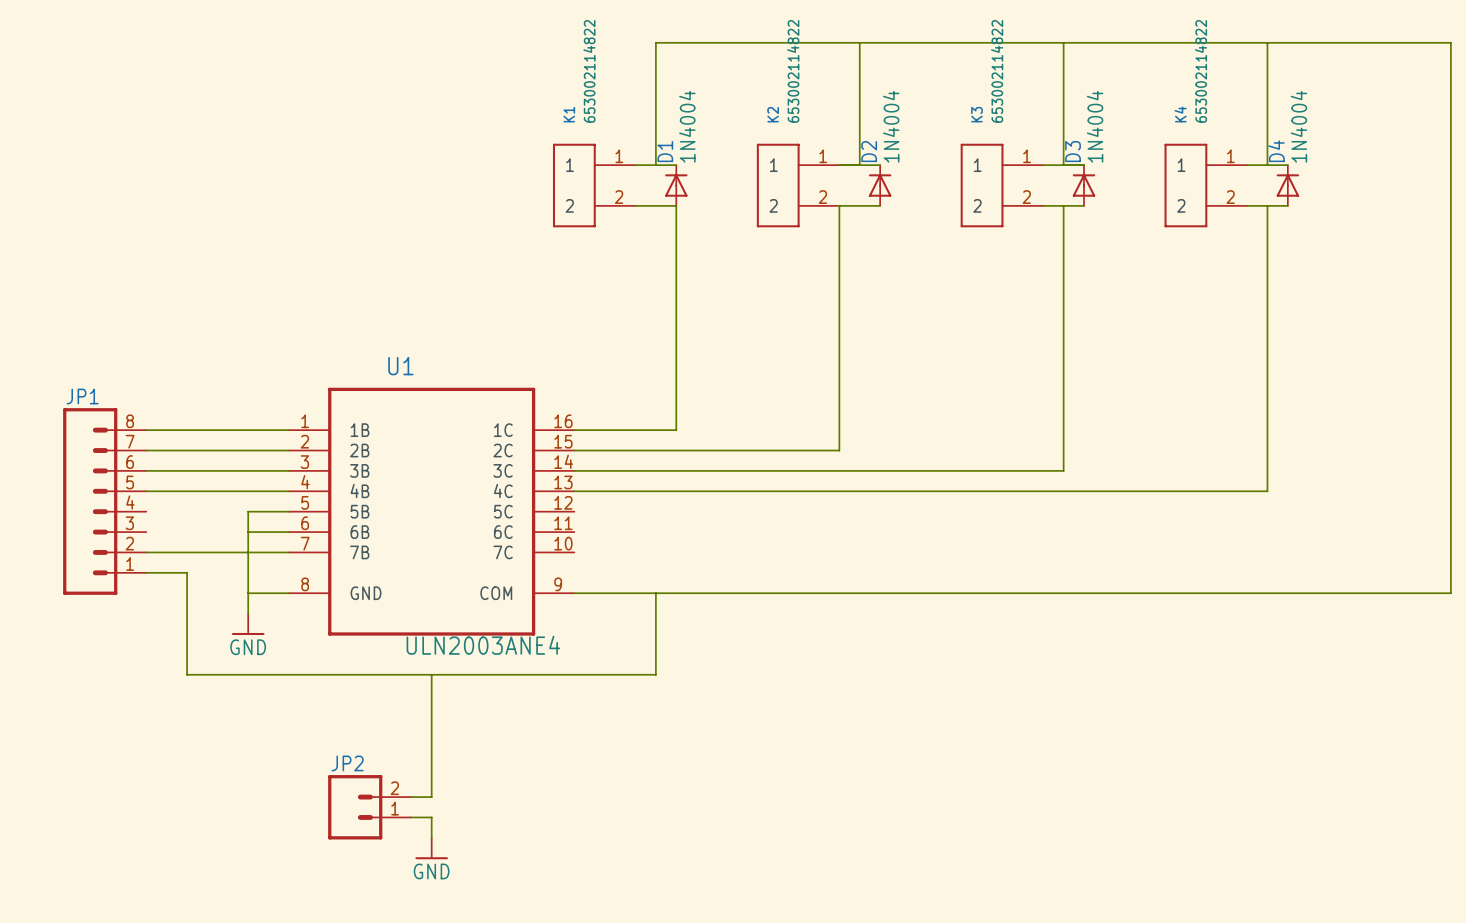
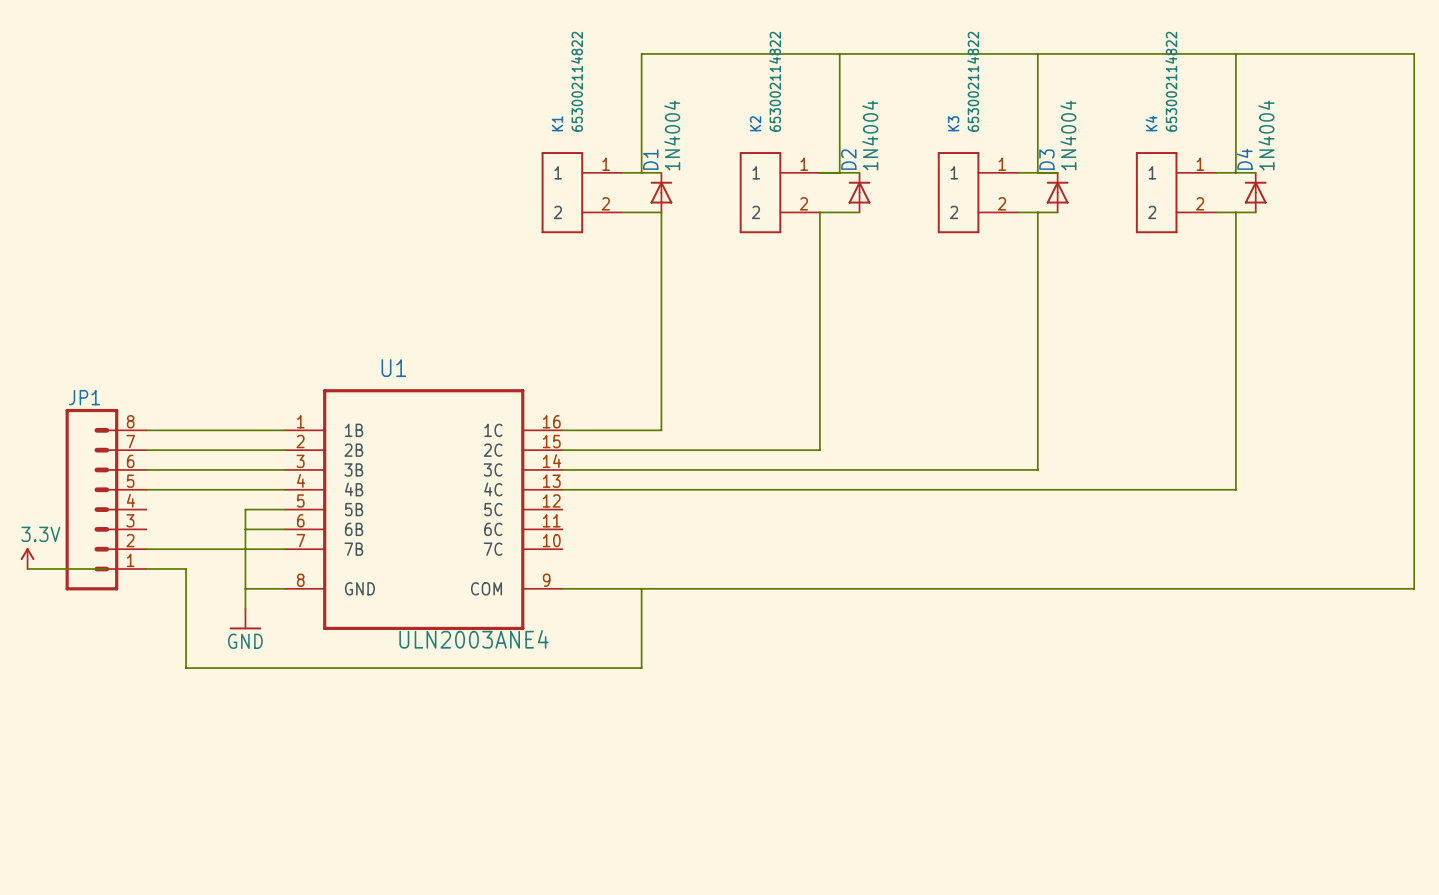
power symbol: none -> 3.3V (27, 558)
wire: none -> (27, 569) (106, 569)
wire: (431, 674) (431, 797) (411, 797) -> none
JP2: (369, 807) -> none
wire: (411, 817) (431, 817) (431, 837) -> none
power symbol: GND (431, 848) -> none

